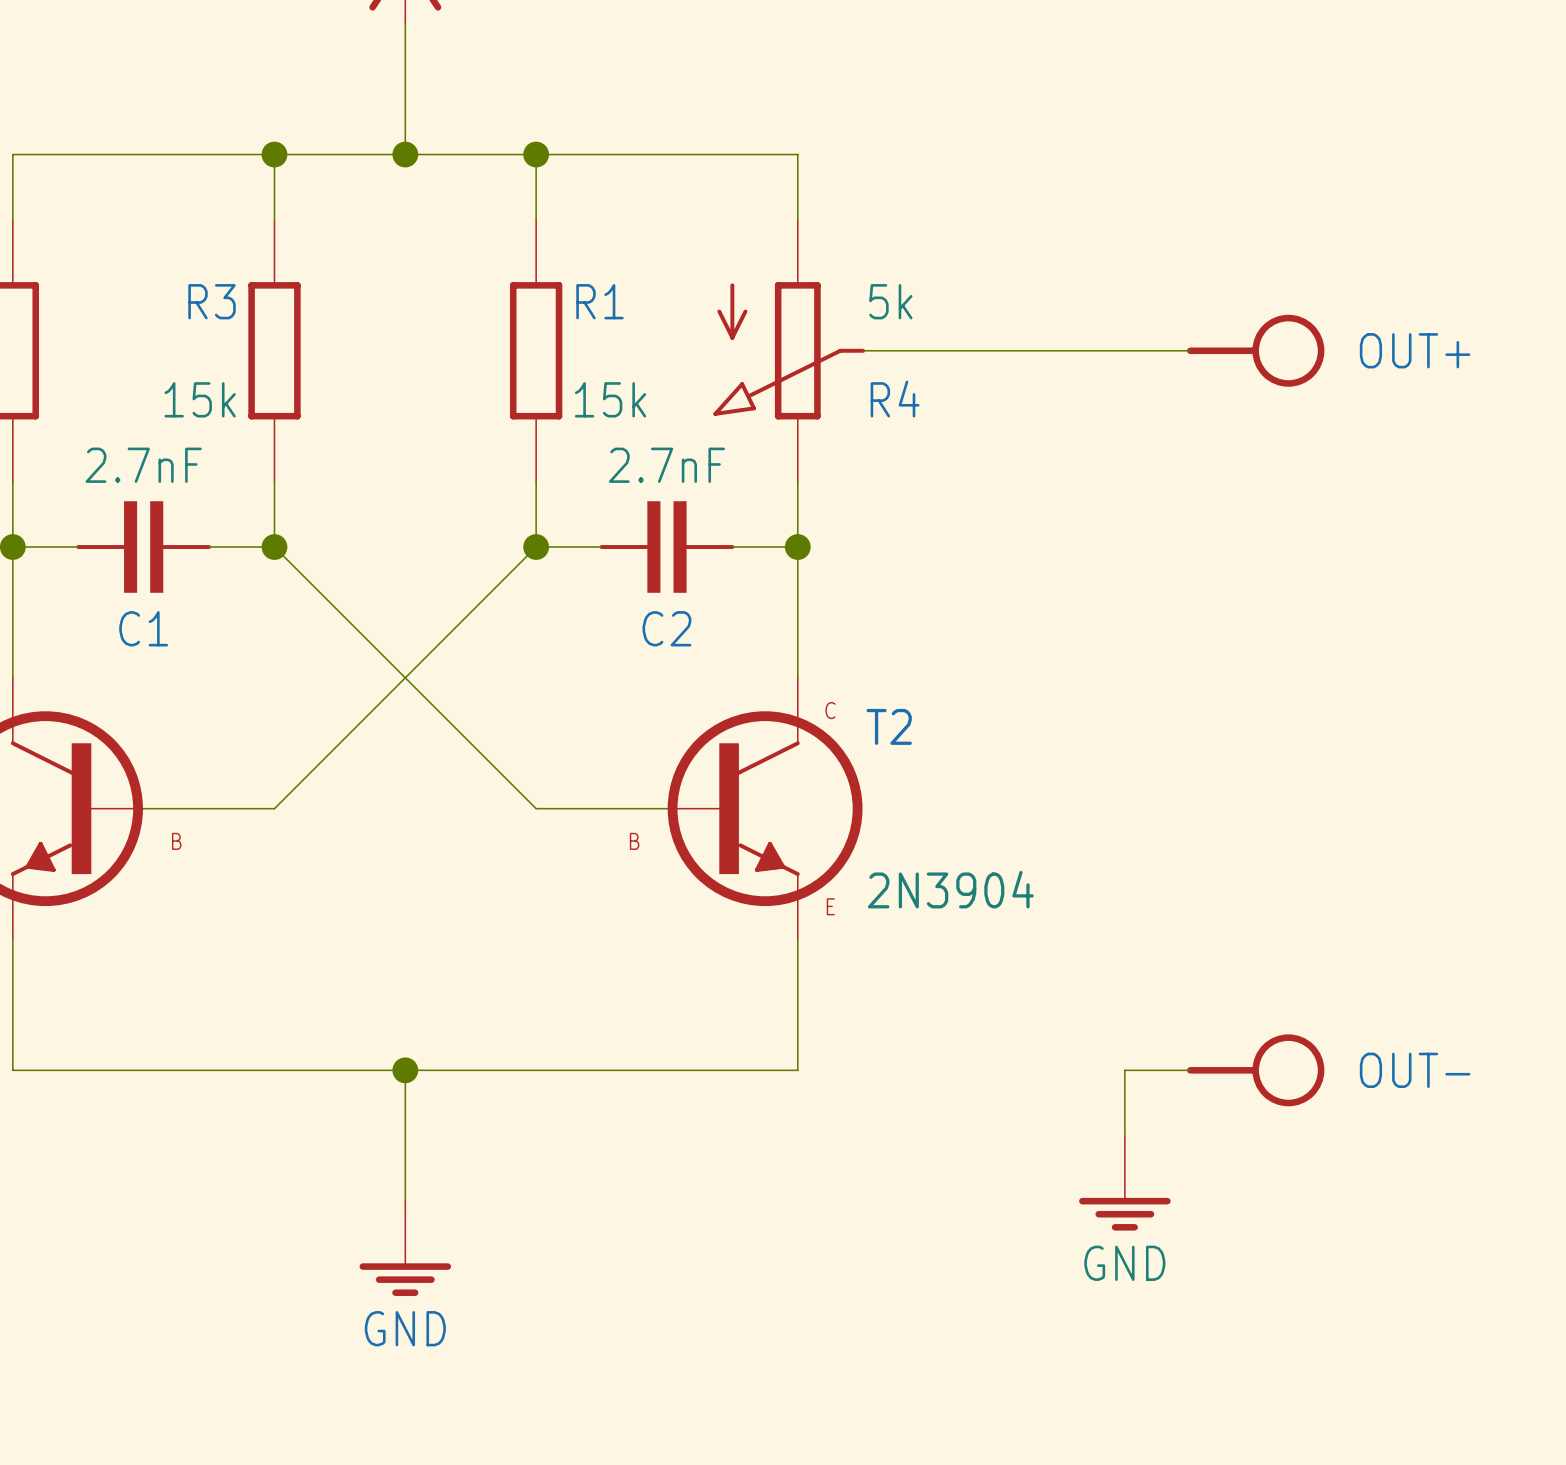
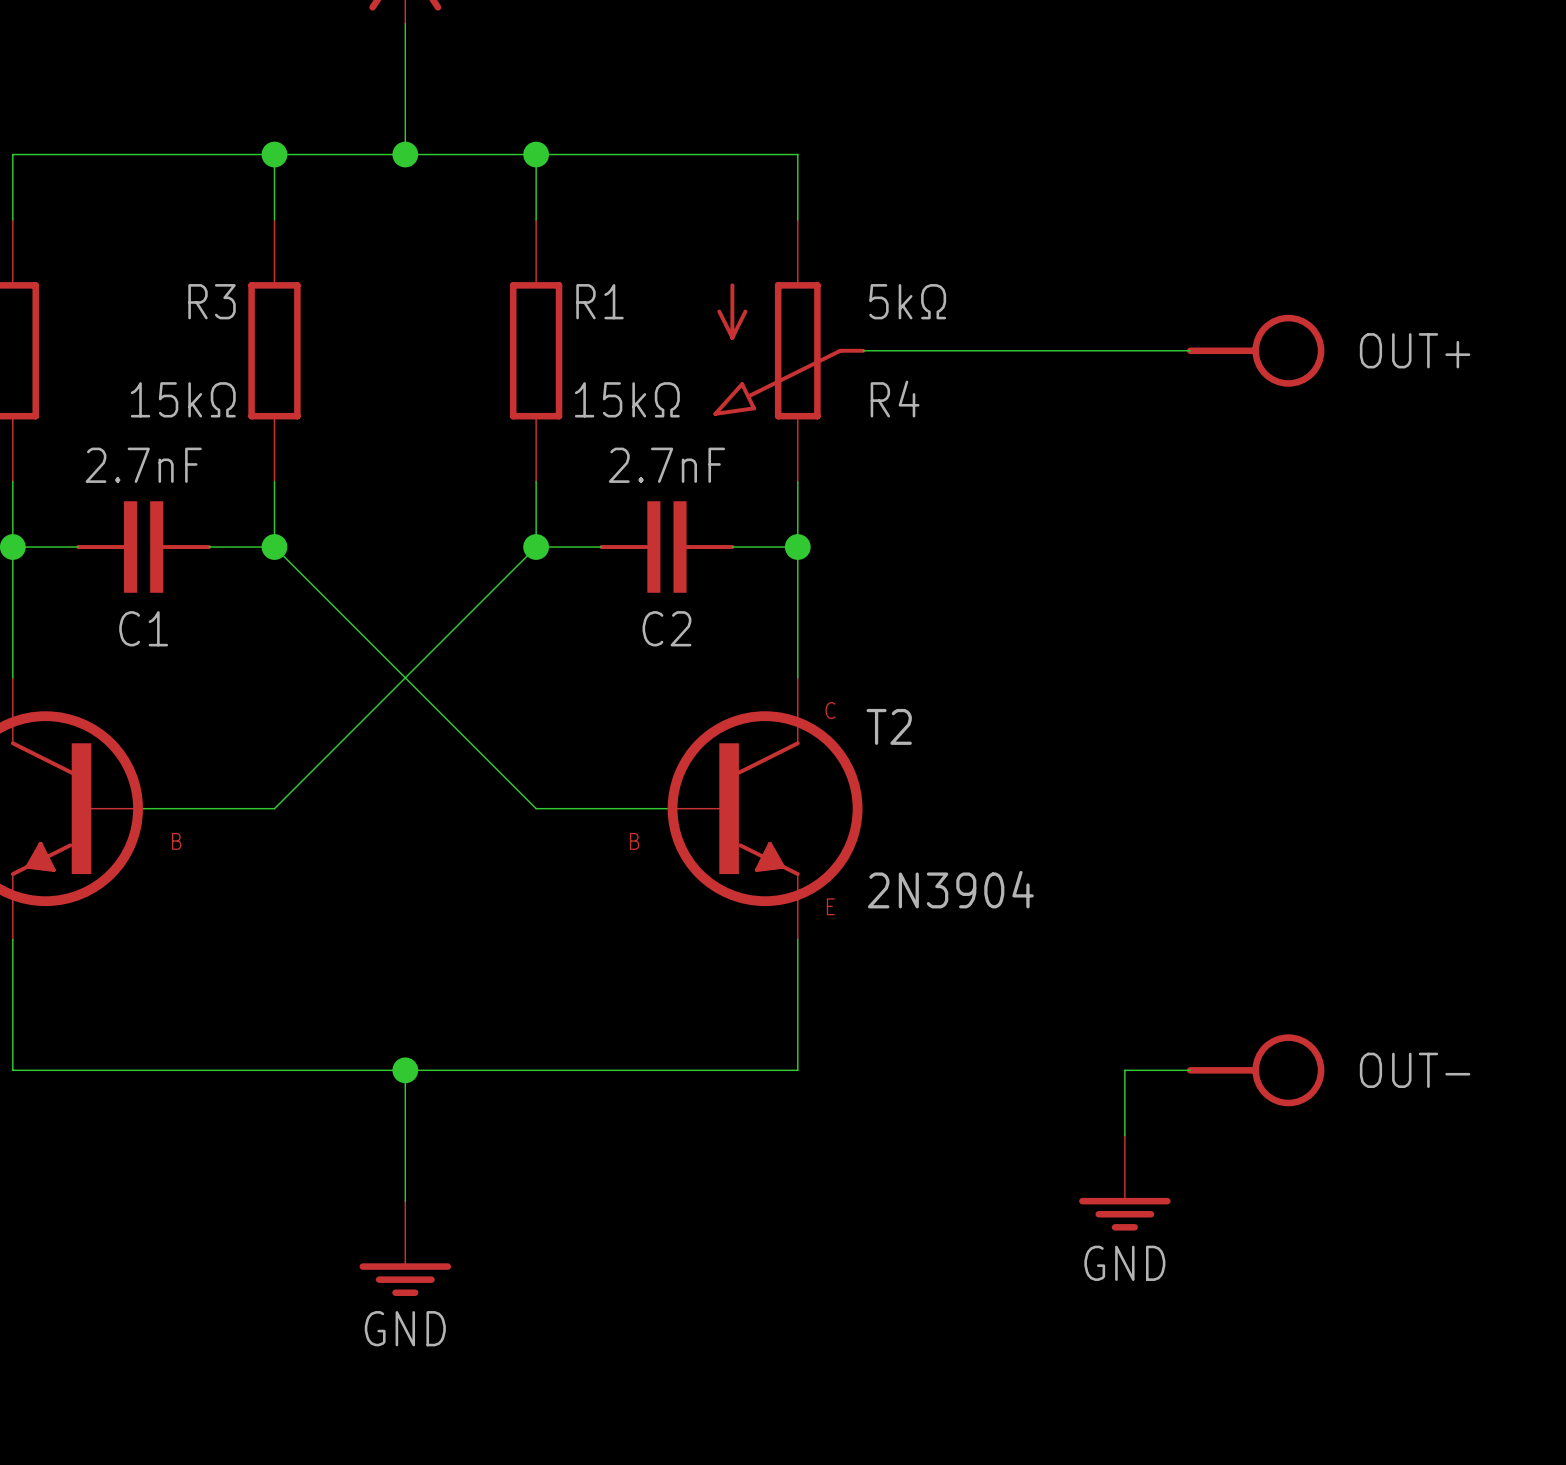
R4 value: 5k (890, 301) -> 5kΩ (907, 301)
R3 value: 15k (200, 399) -> 15kΩ (183, 399)
R1 value: 15k (610, 399) -> 15kΩ (627, 399)

